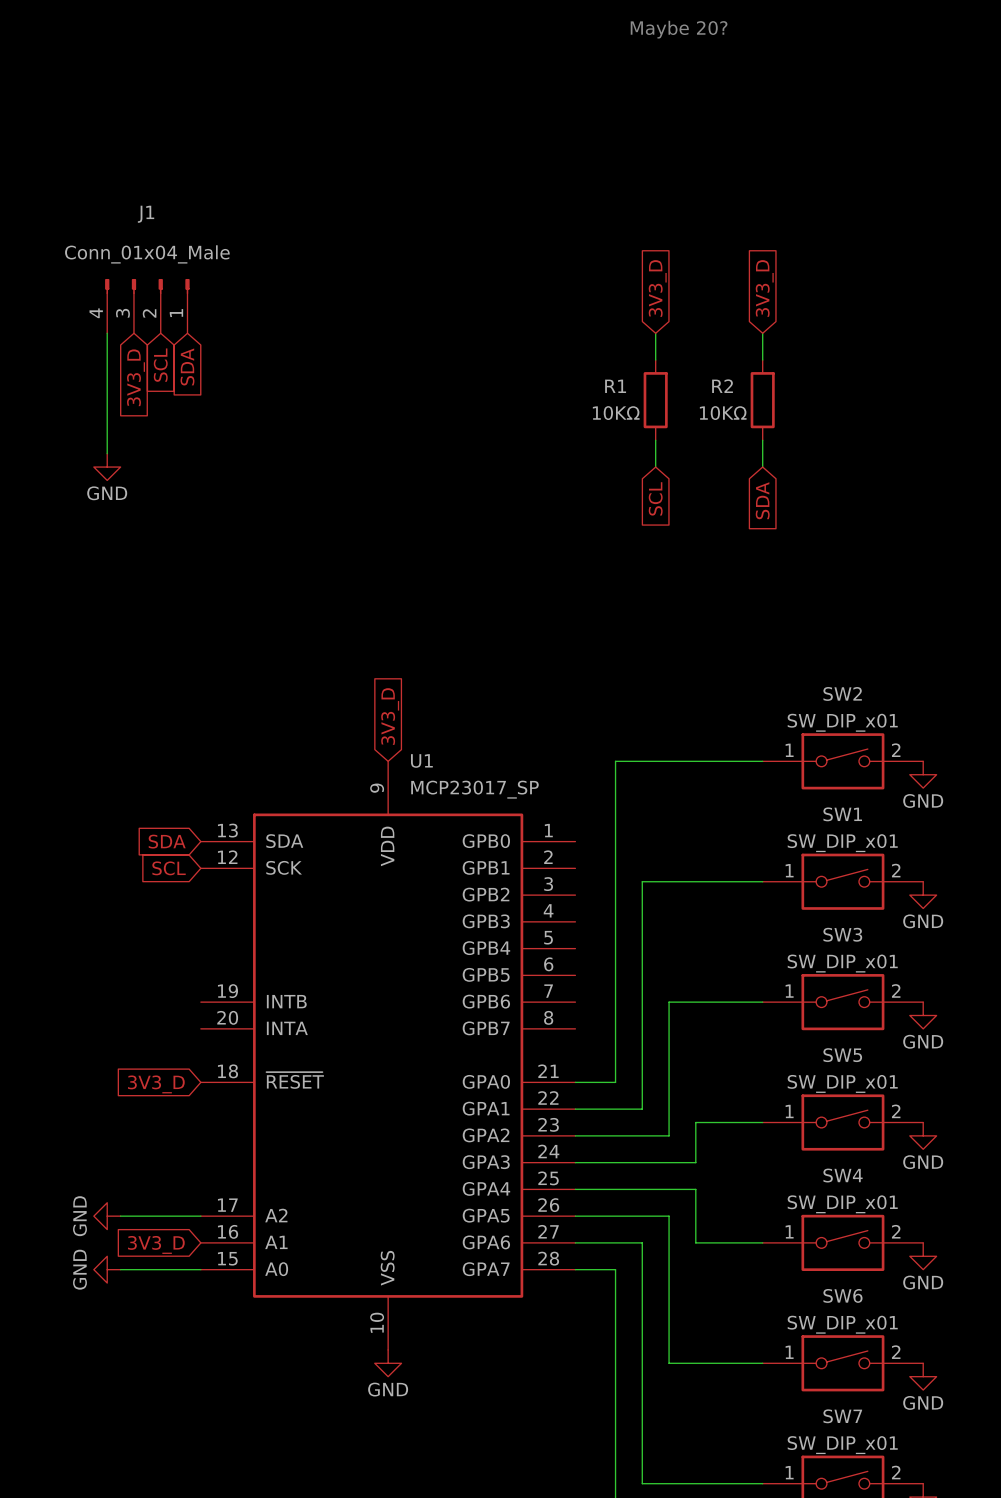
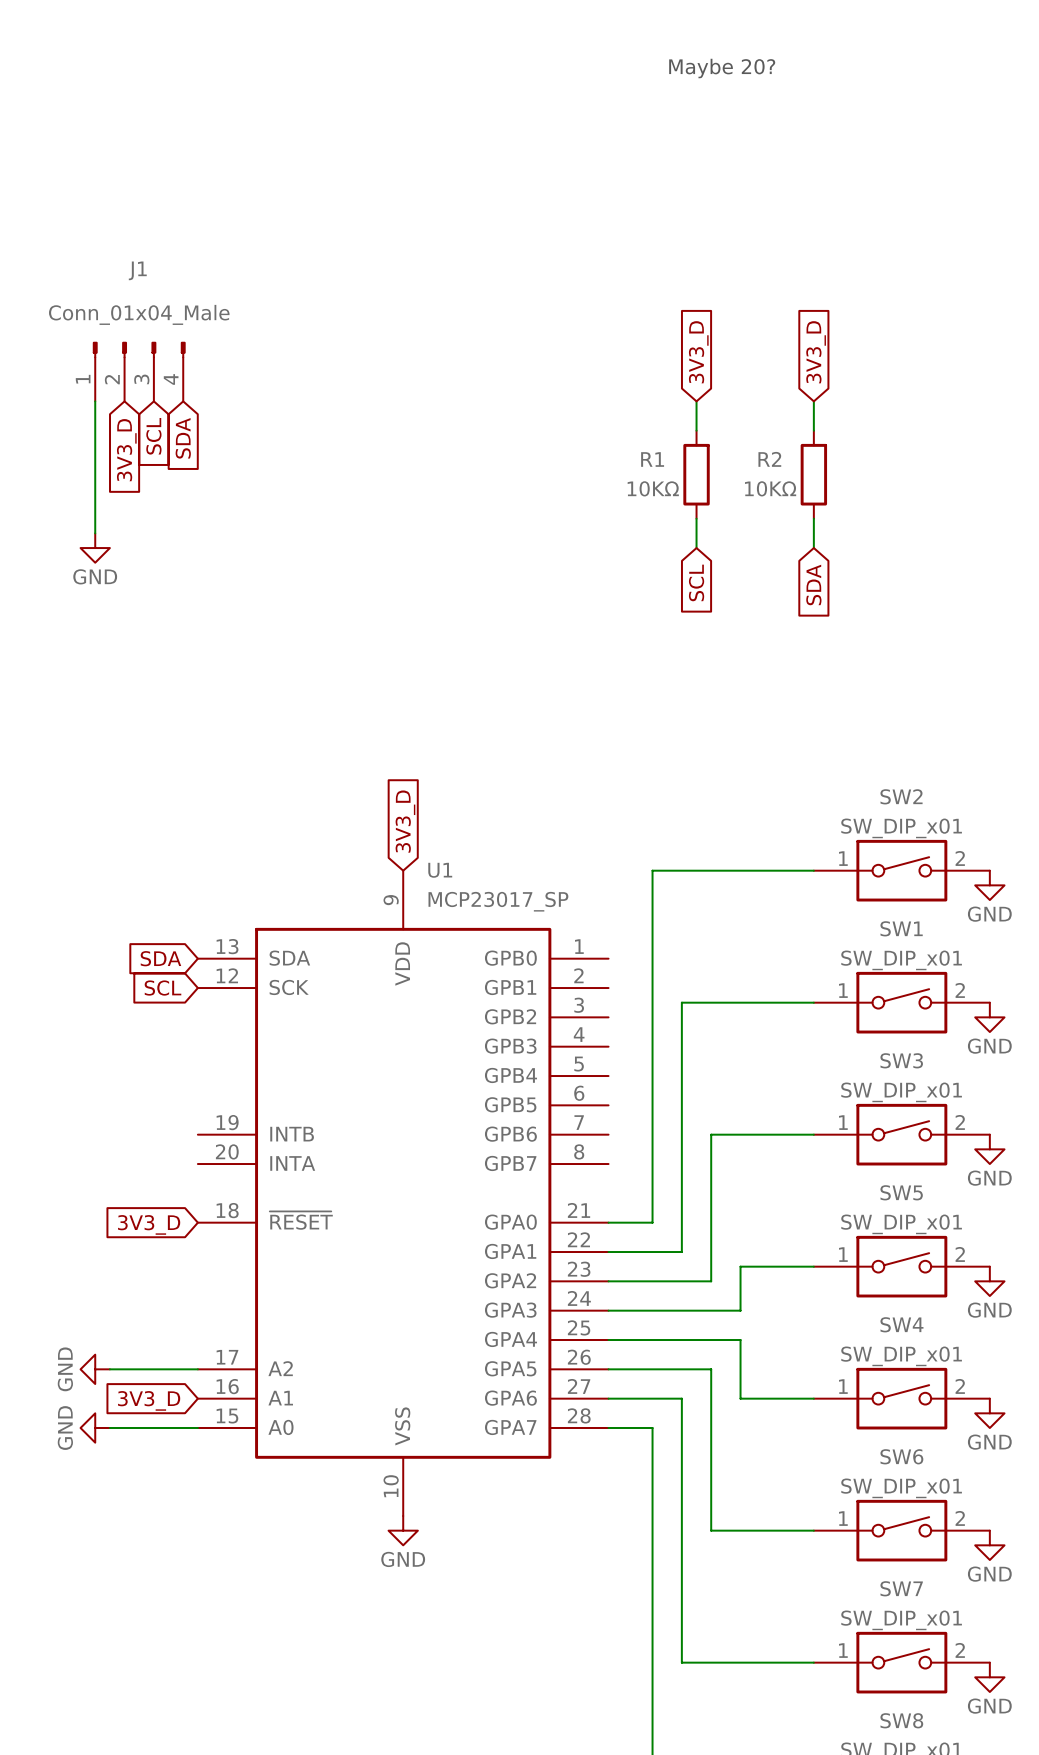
J1 flip: as is (147, 286) -> left-right (139, 350)

